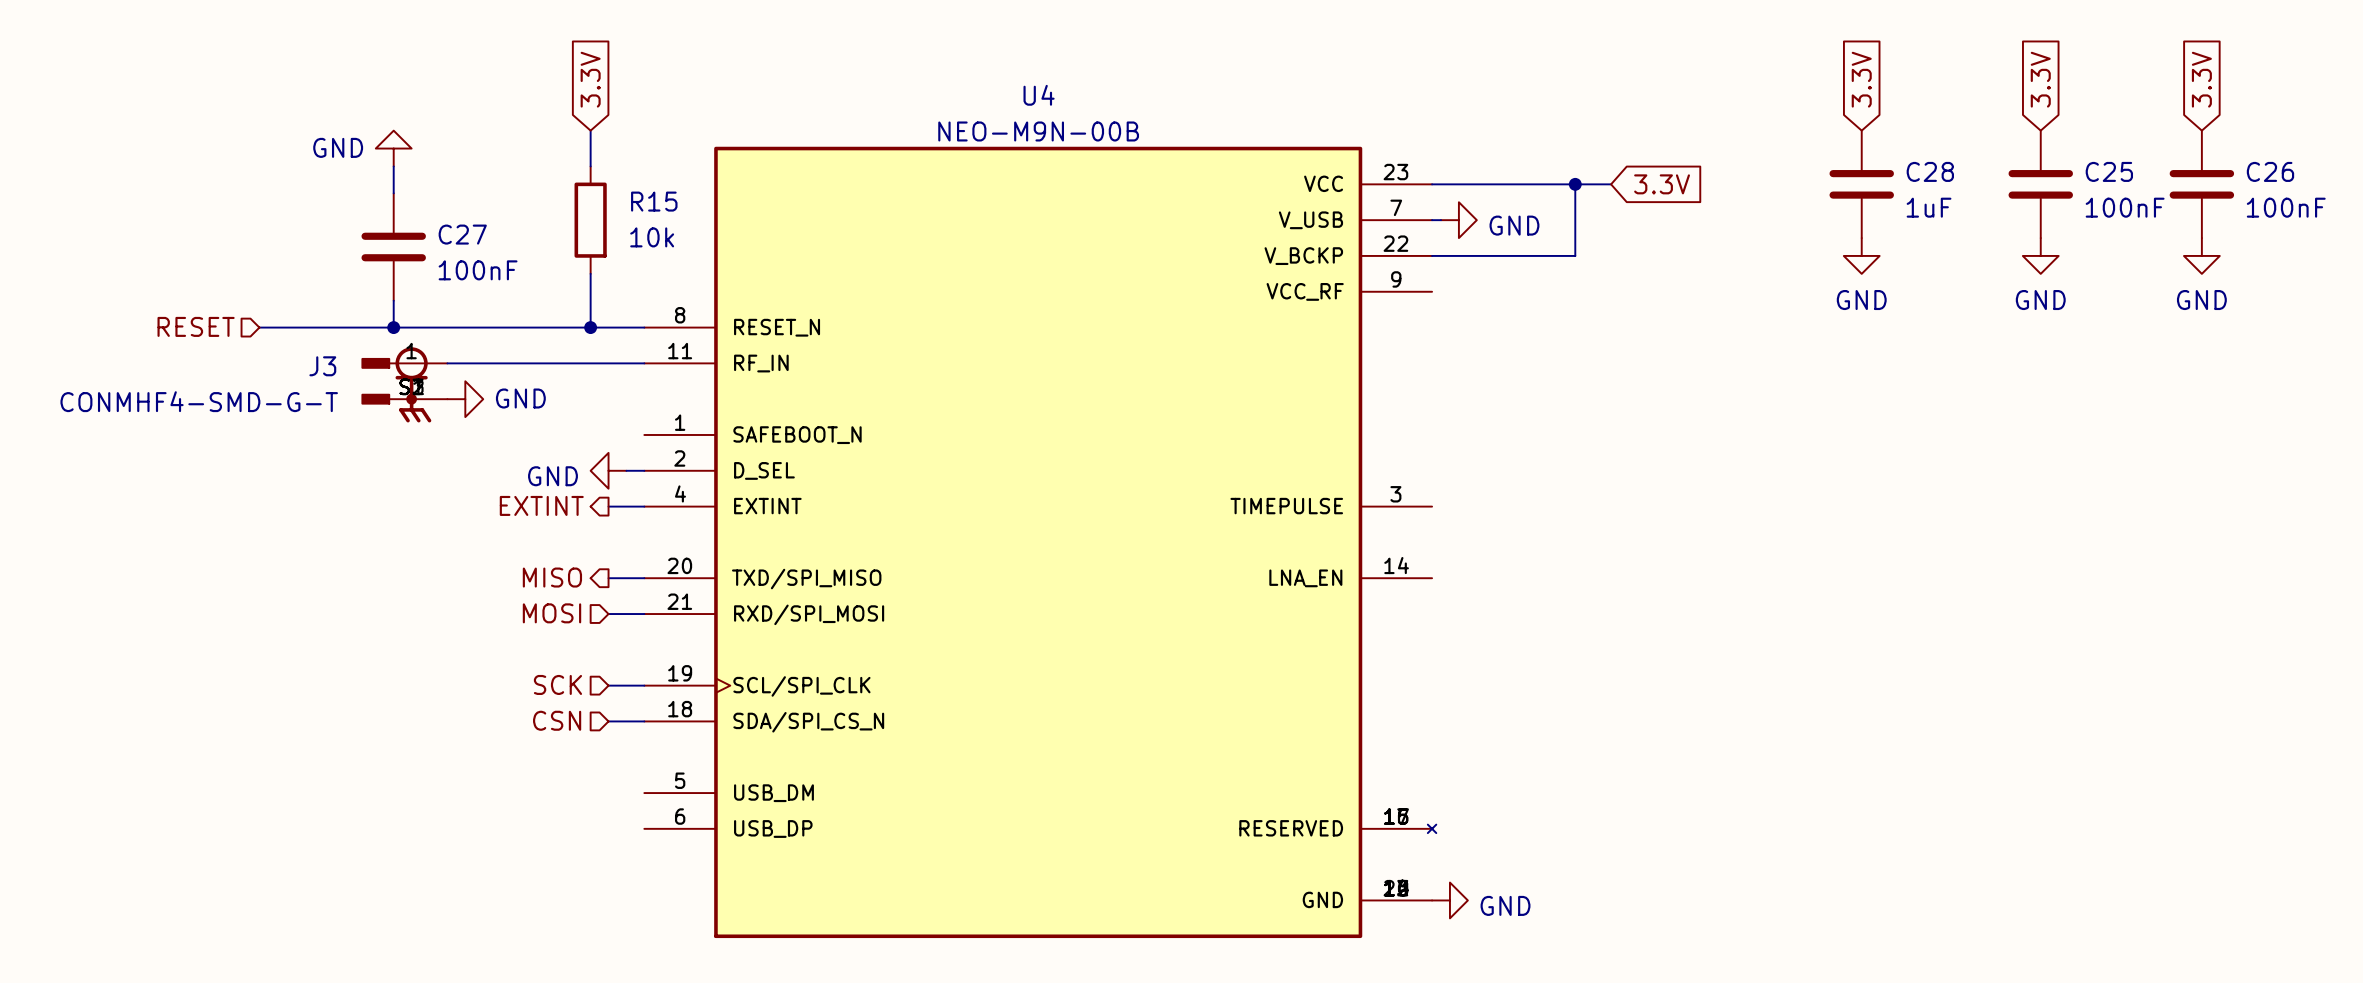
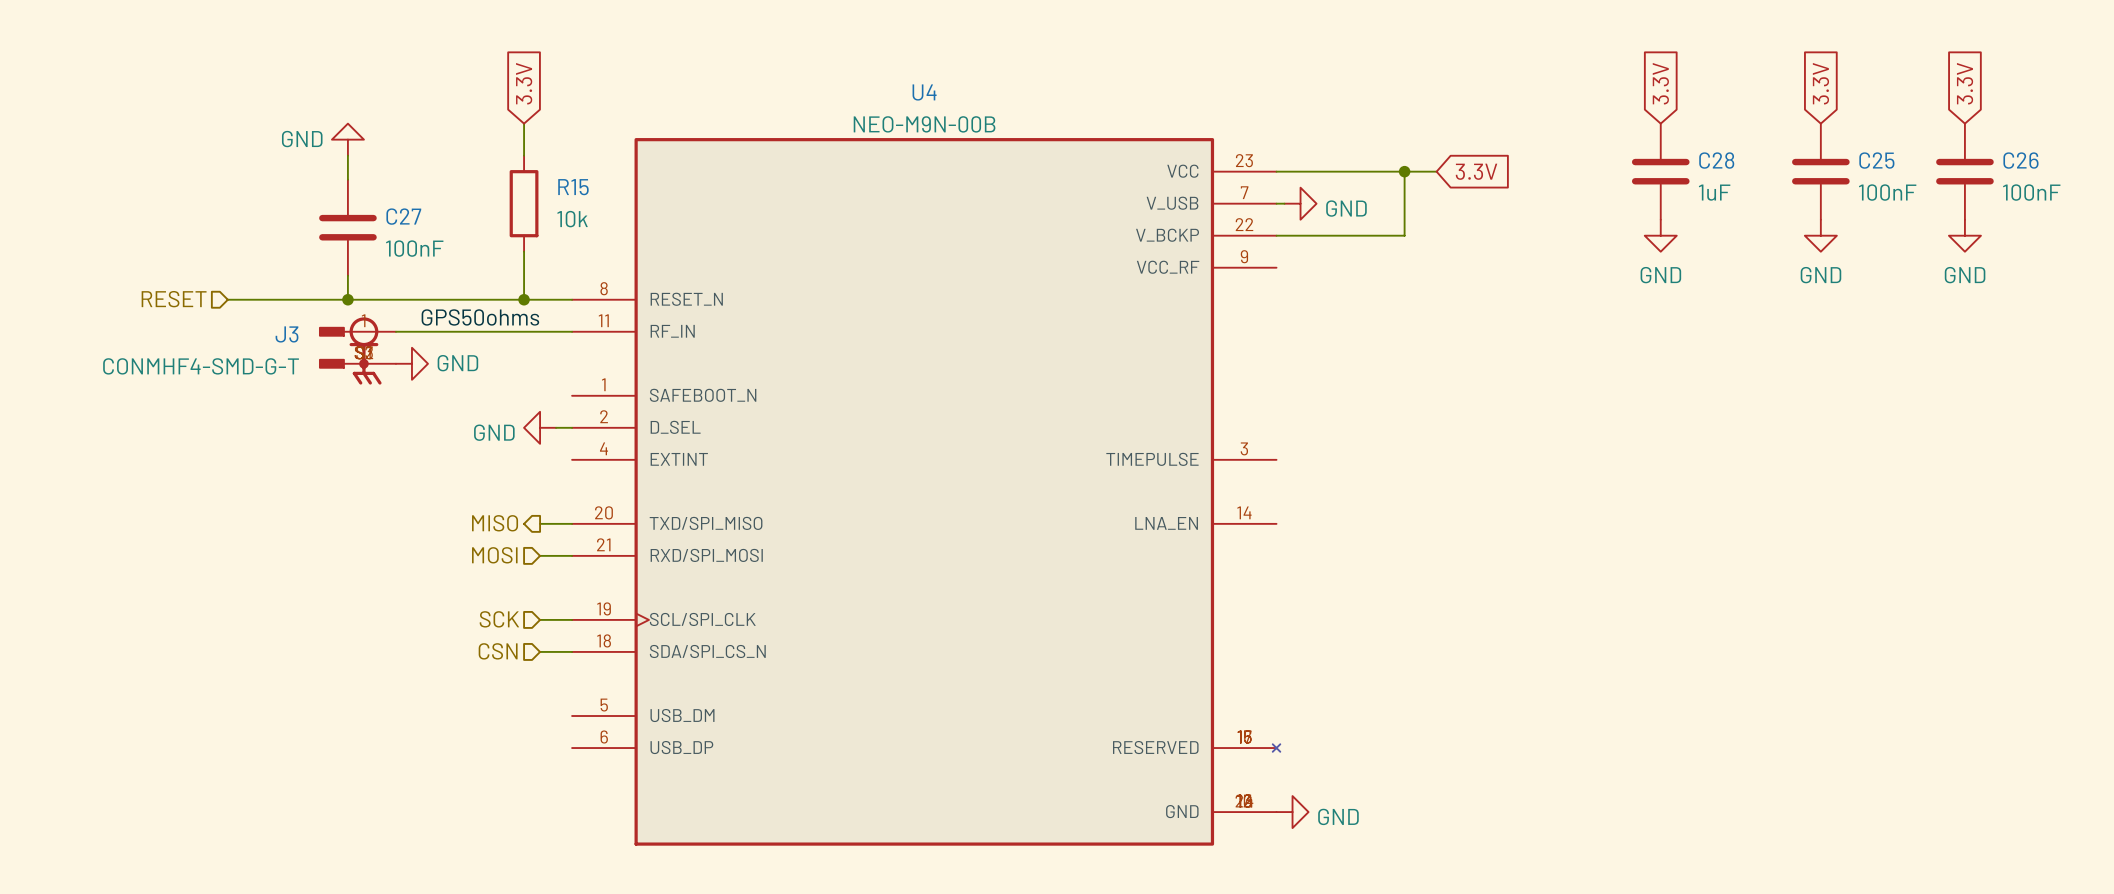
label: none -> GPS50ohms (480, 317)
hierarchical label: EXTINT (541, 505) -> none
wire: (608, 506) (644, 506) -> none

